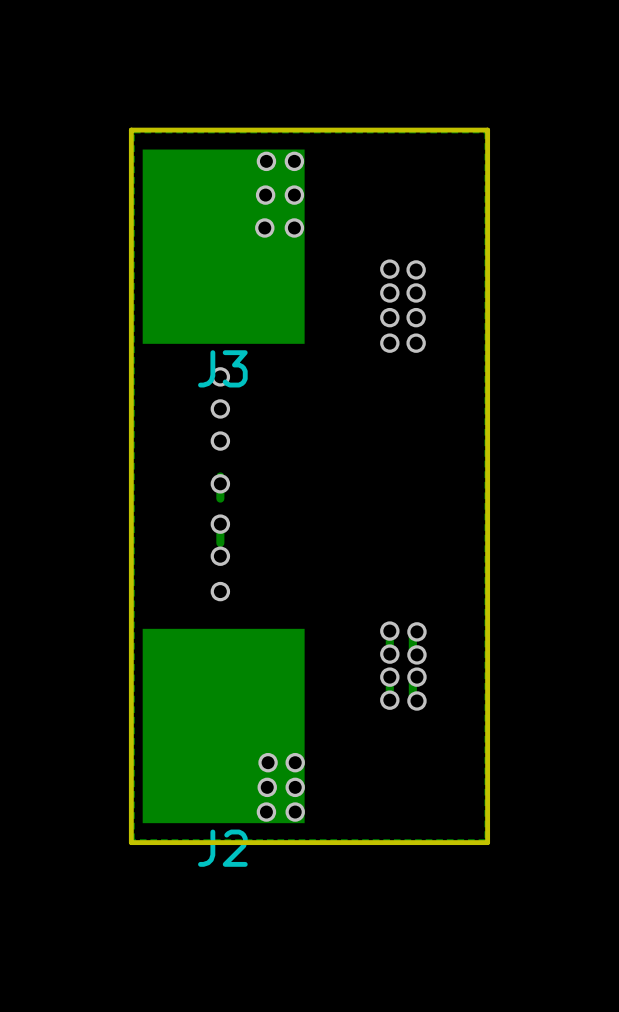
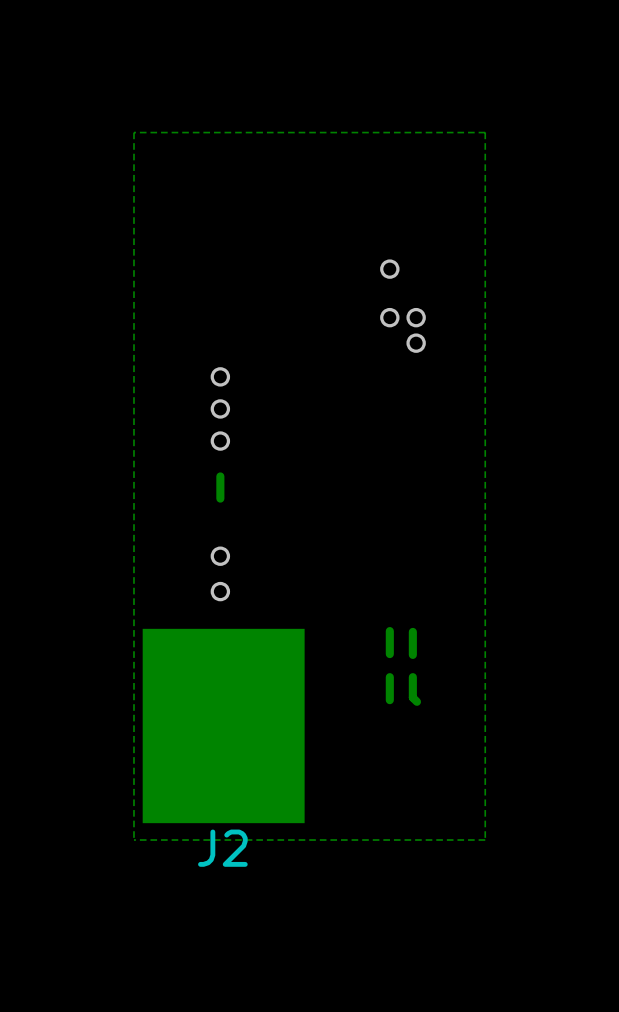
board edge: (487, 130) (131, 130) (131, 842) (487, 842) (487, 130) -> none
via: (266, 161) -> none
via: (294, 161) -> none
via: (265, 195) -> none
via: (294, 195) -> none
via: (264, 227) -> none
via: (294, 227) -> none
J3: (223, 246) -> none
via: (416, 269) -> none
via: (389, 292) -> none
via: (416, 292) -> none
via: (389, 343) -> none
via: (220, 483) -> none
track: (220, 520) (220, 543) -> none
via: (220, 524) -> none
via: (389, 631) -> none
via: (416, 631) -> none
via: (389, 654) -> none
via: (416, 654) -> none
via: (389, 677) -> none
via: (416, 677) -> none
via: (389, 700) -> none
via: (416, 700) -> none
via: (268, 762) -> none
via: (295, 762) -> none
via: (267, 787) -> none
via: (295, 787) -> none
via: (266, 812) -> none
via: (295, 812) -> none

